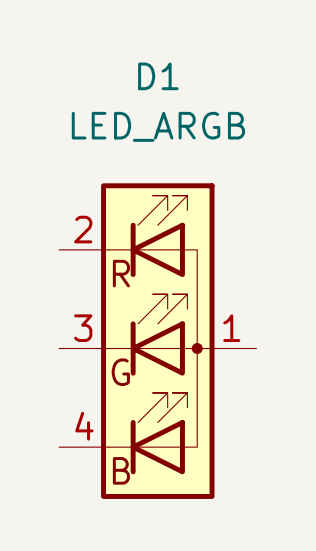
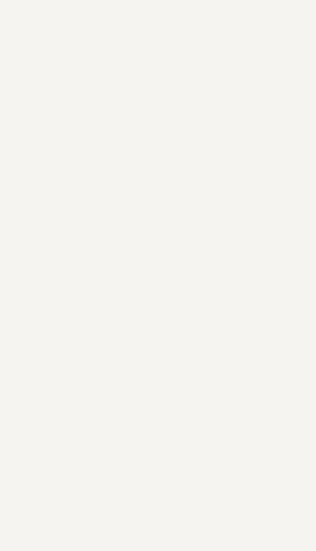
D1: LED_ARGB (157, 341) -> none

